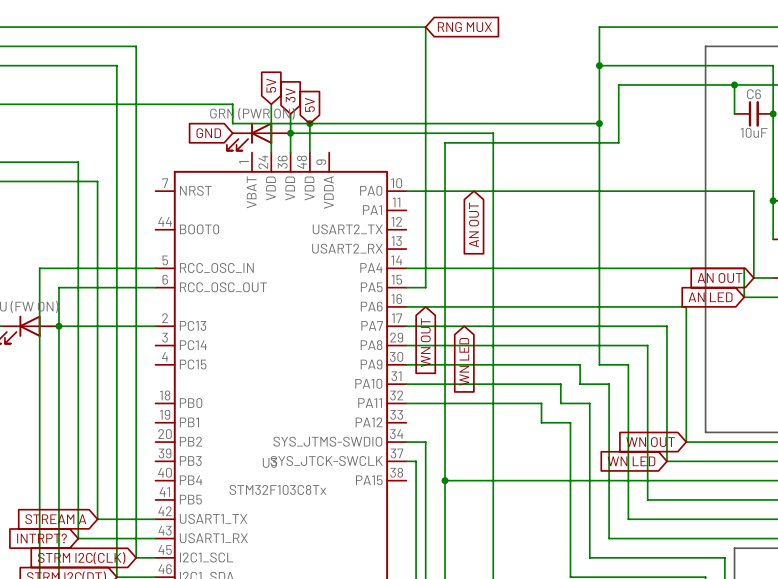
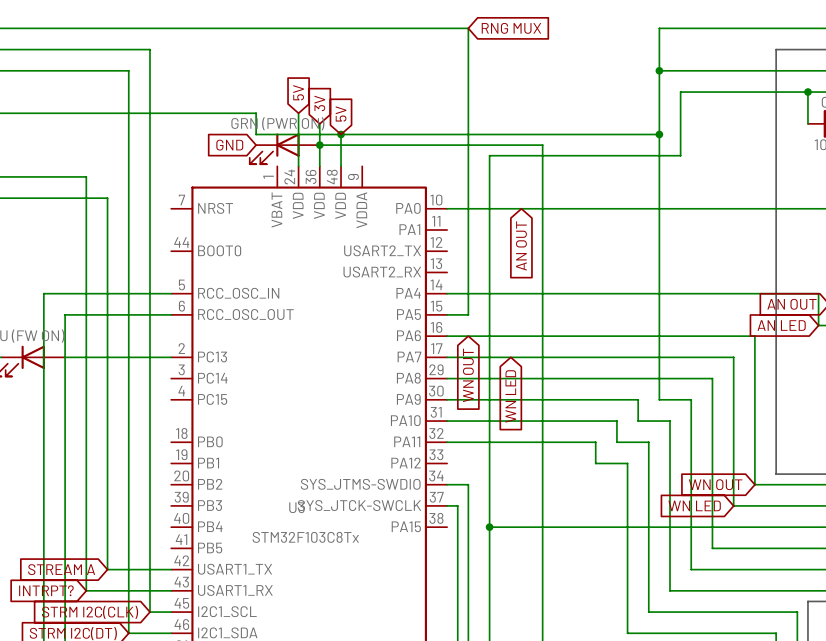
junction: (58, 326) -> none

